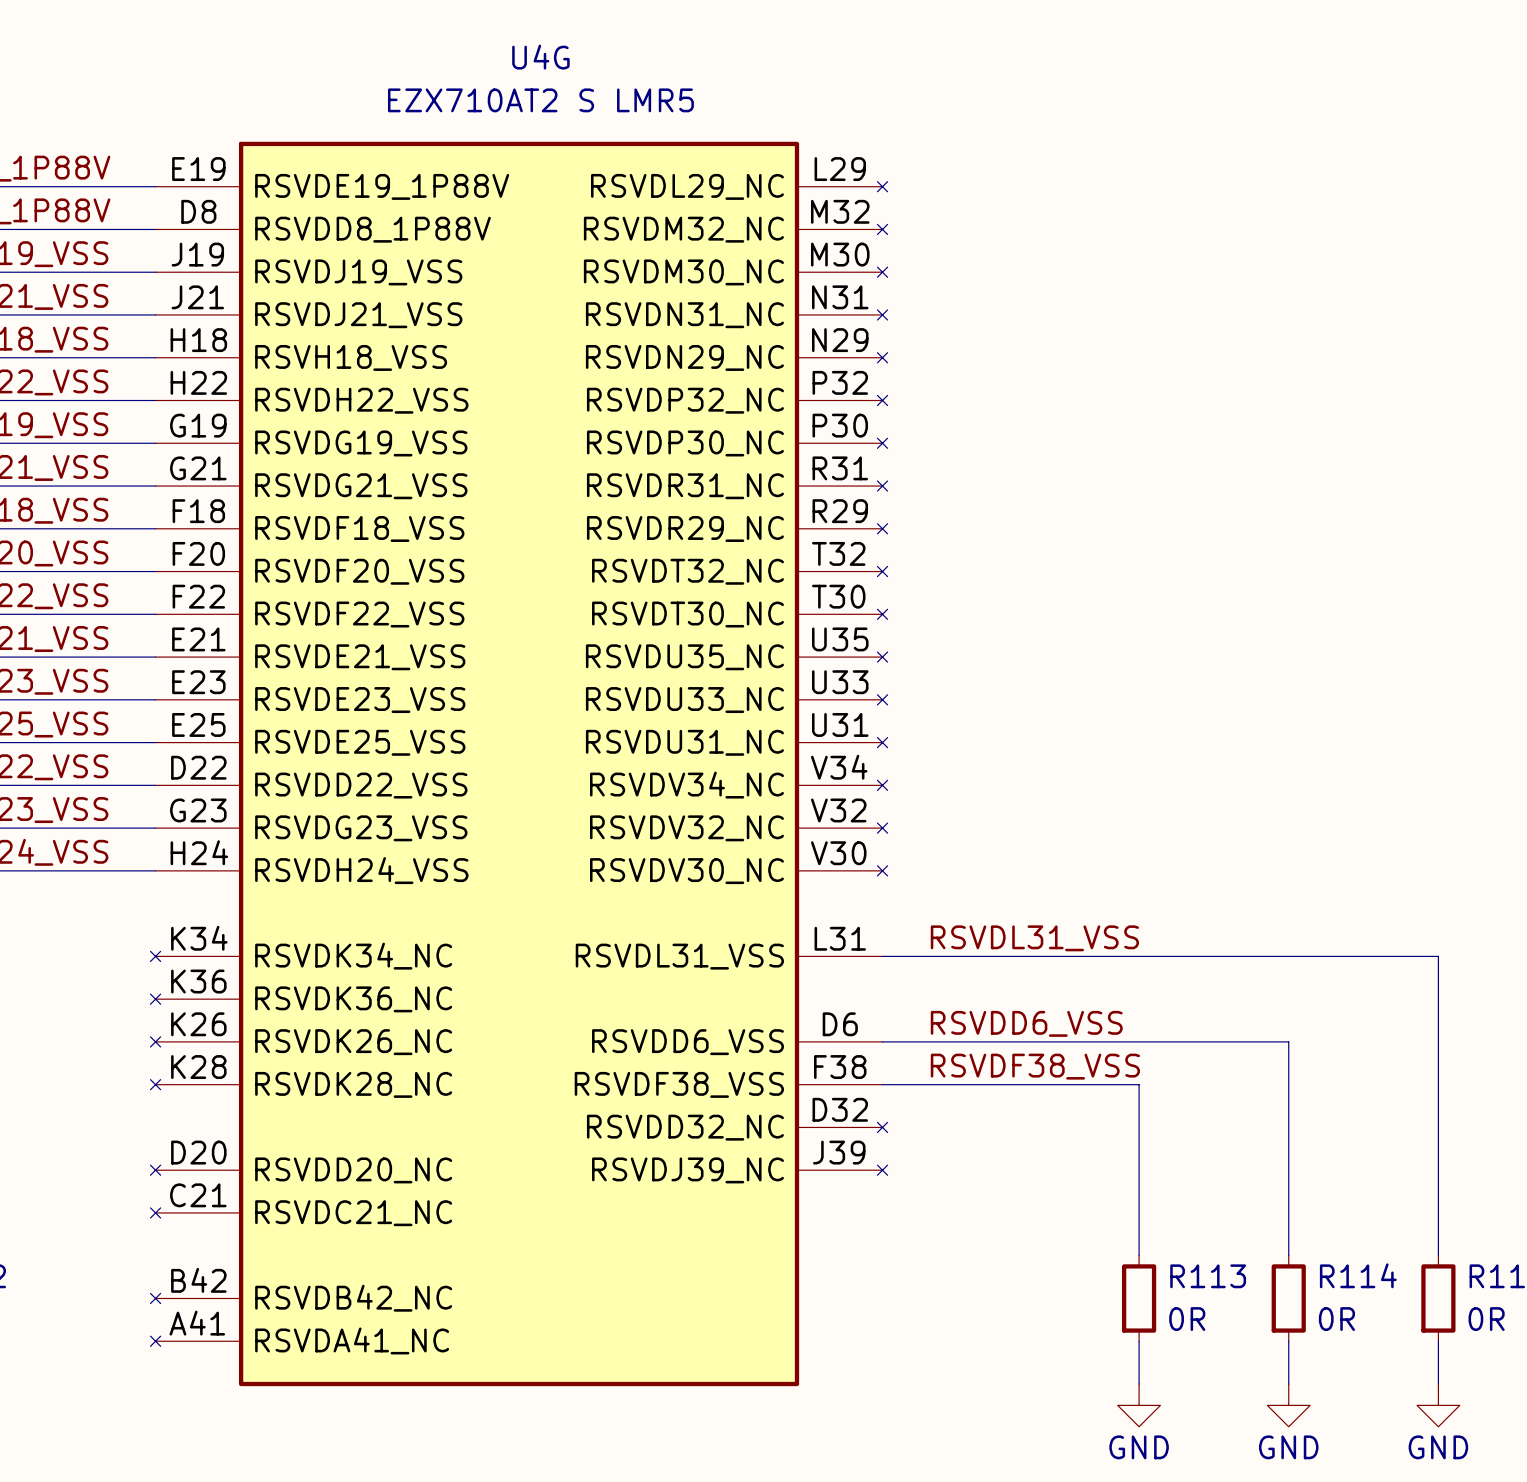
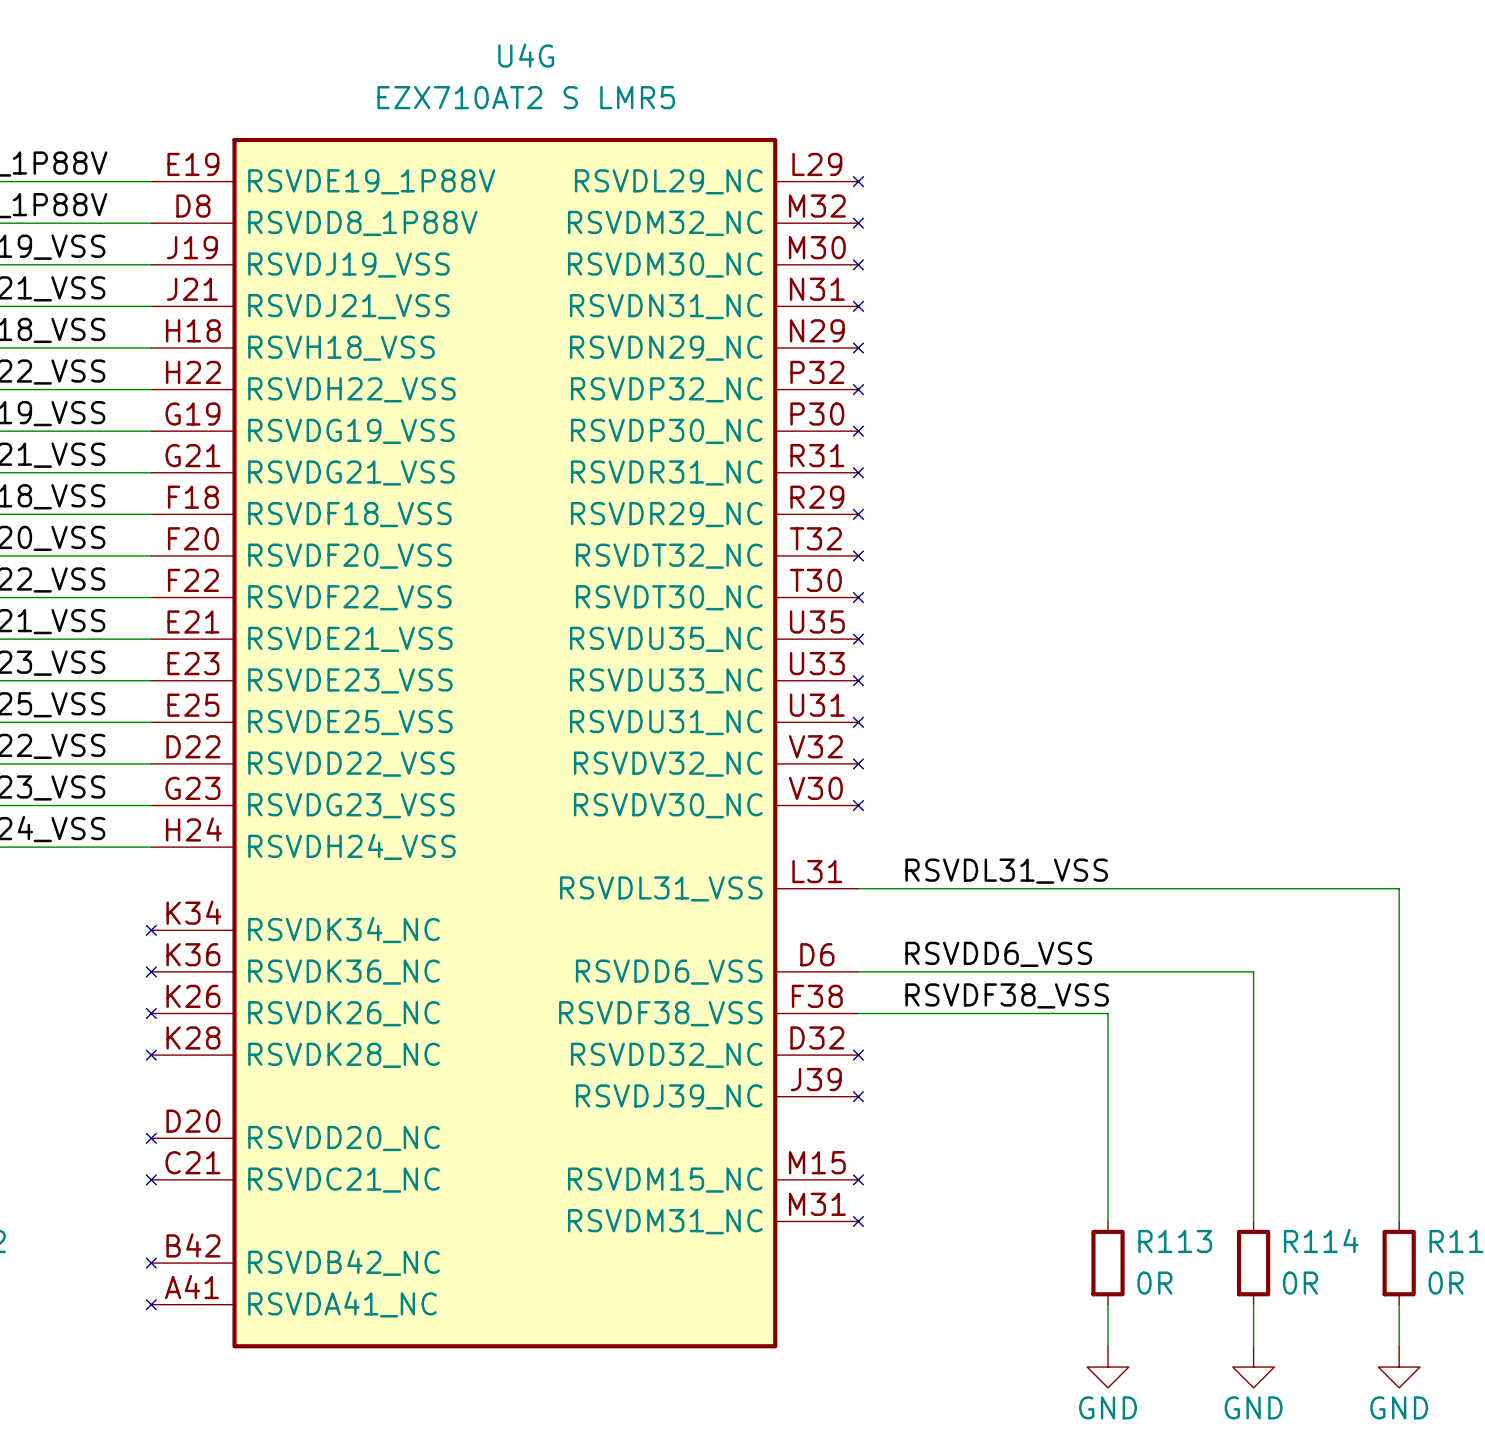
U4G symbol: [150, 141, 888, 1387] -> [146, 137, 864, 1349]
label position: RSVDL31_VSS (1034, 938) -> RSVDL31_VSS (1006, 871)
wire: (882, 956) (1438, 956) -> (858, 888) (1399, 888) (1399, 930)
label: none -> RSVDD6_VSS (998, 954)
wire: none -> (858, 971) (1253, 971) (1253, 1013)
label: RSVDD6_VSS (1026, 1023) -> RSVDF38_VSS (1007, 995)
wire: (1139, 1041) (1288, 1041) -> (1108, 1013) (1108, 1055)
label: RSVDF38_VSS (1035, 1066) -> none
wire: (882, 1084) (1139, 1084) -> none

